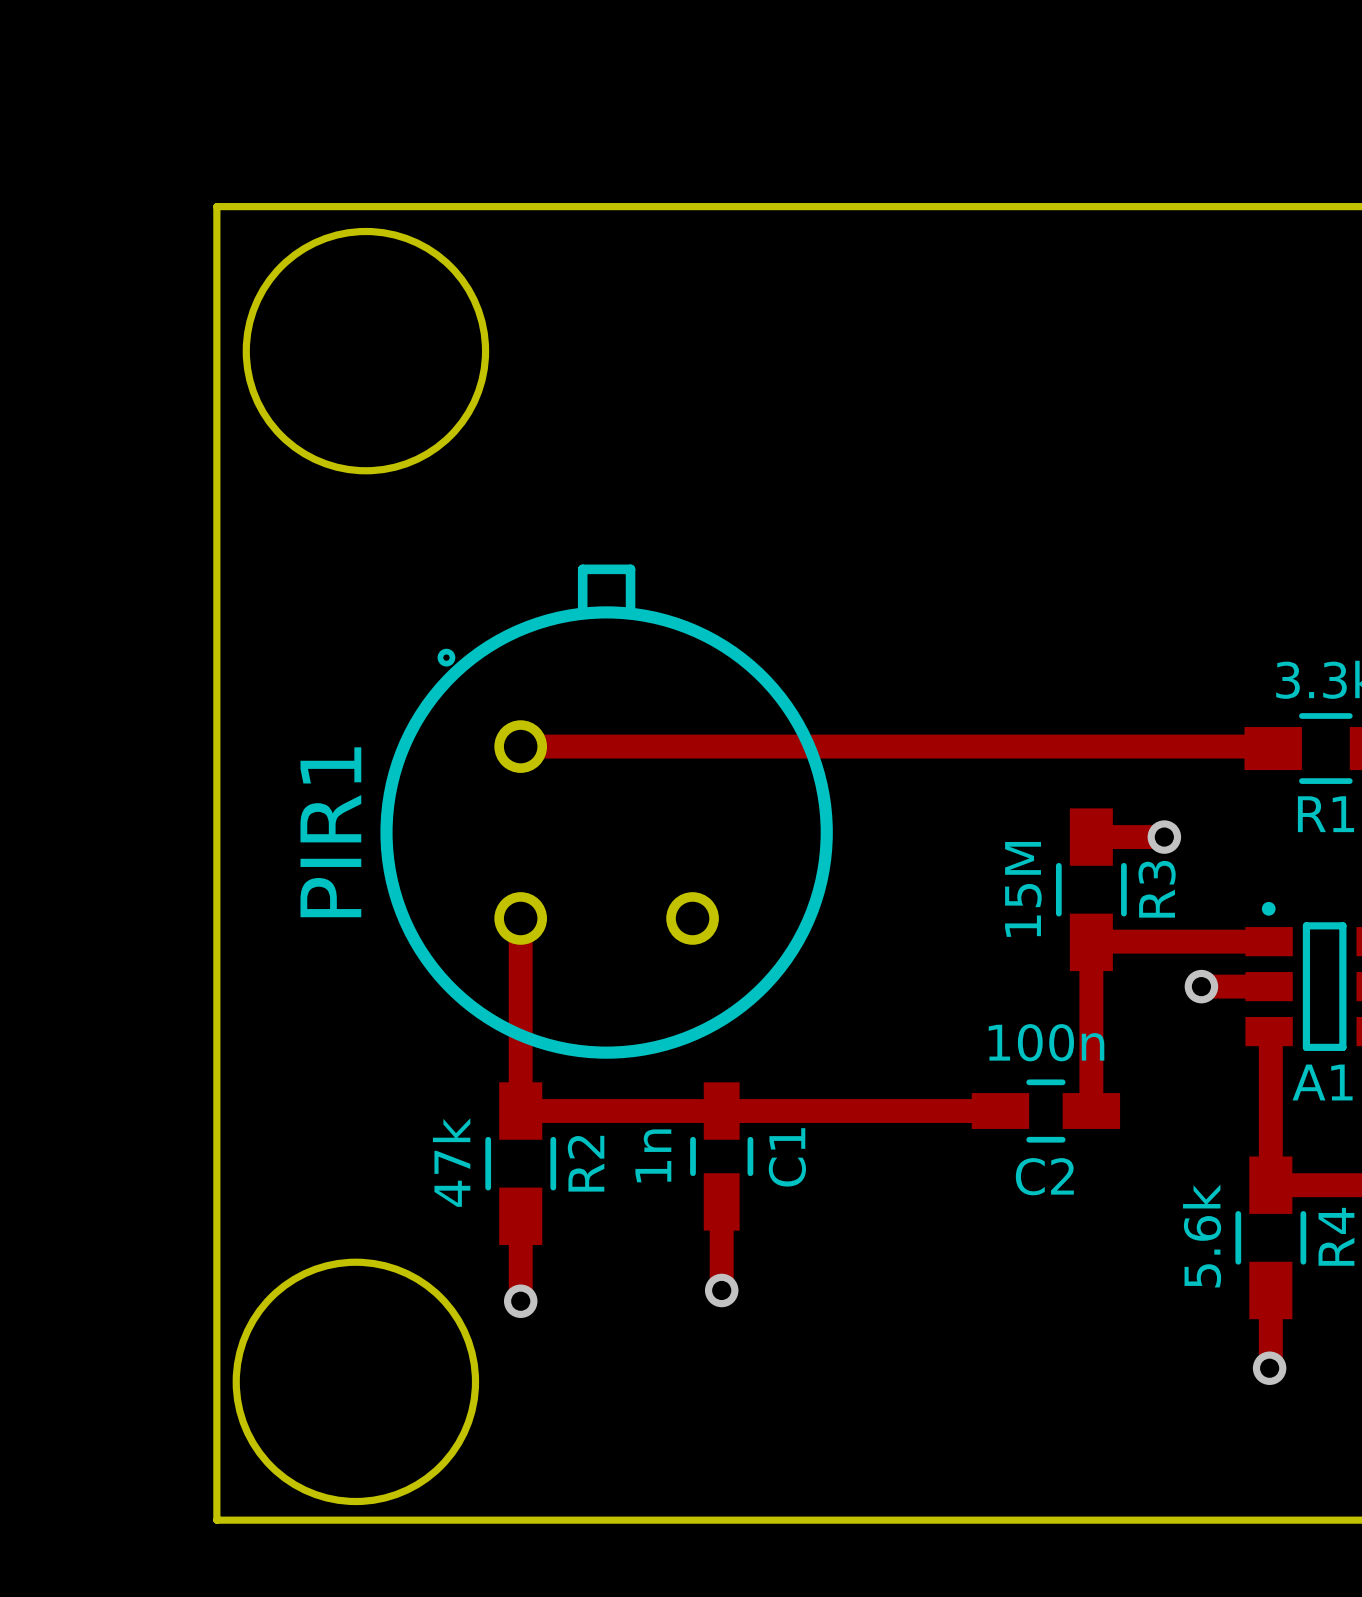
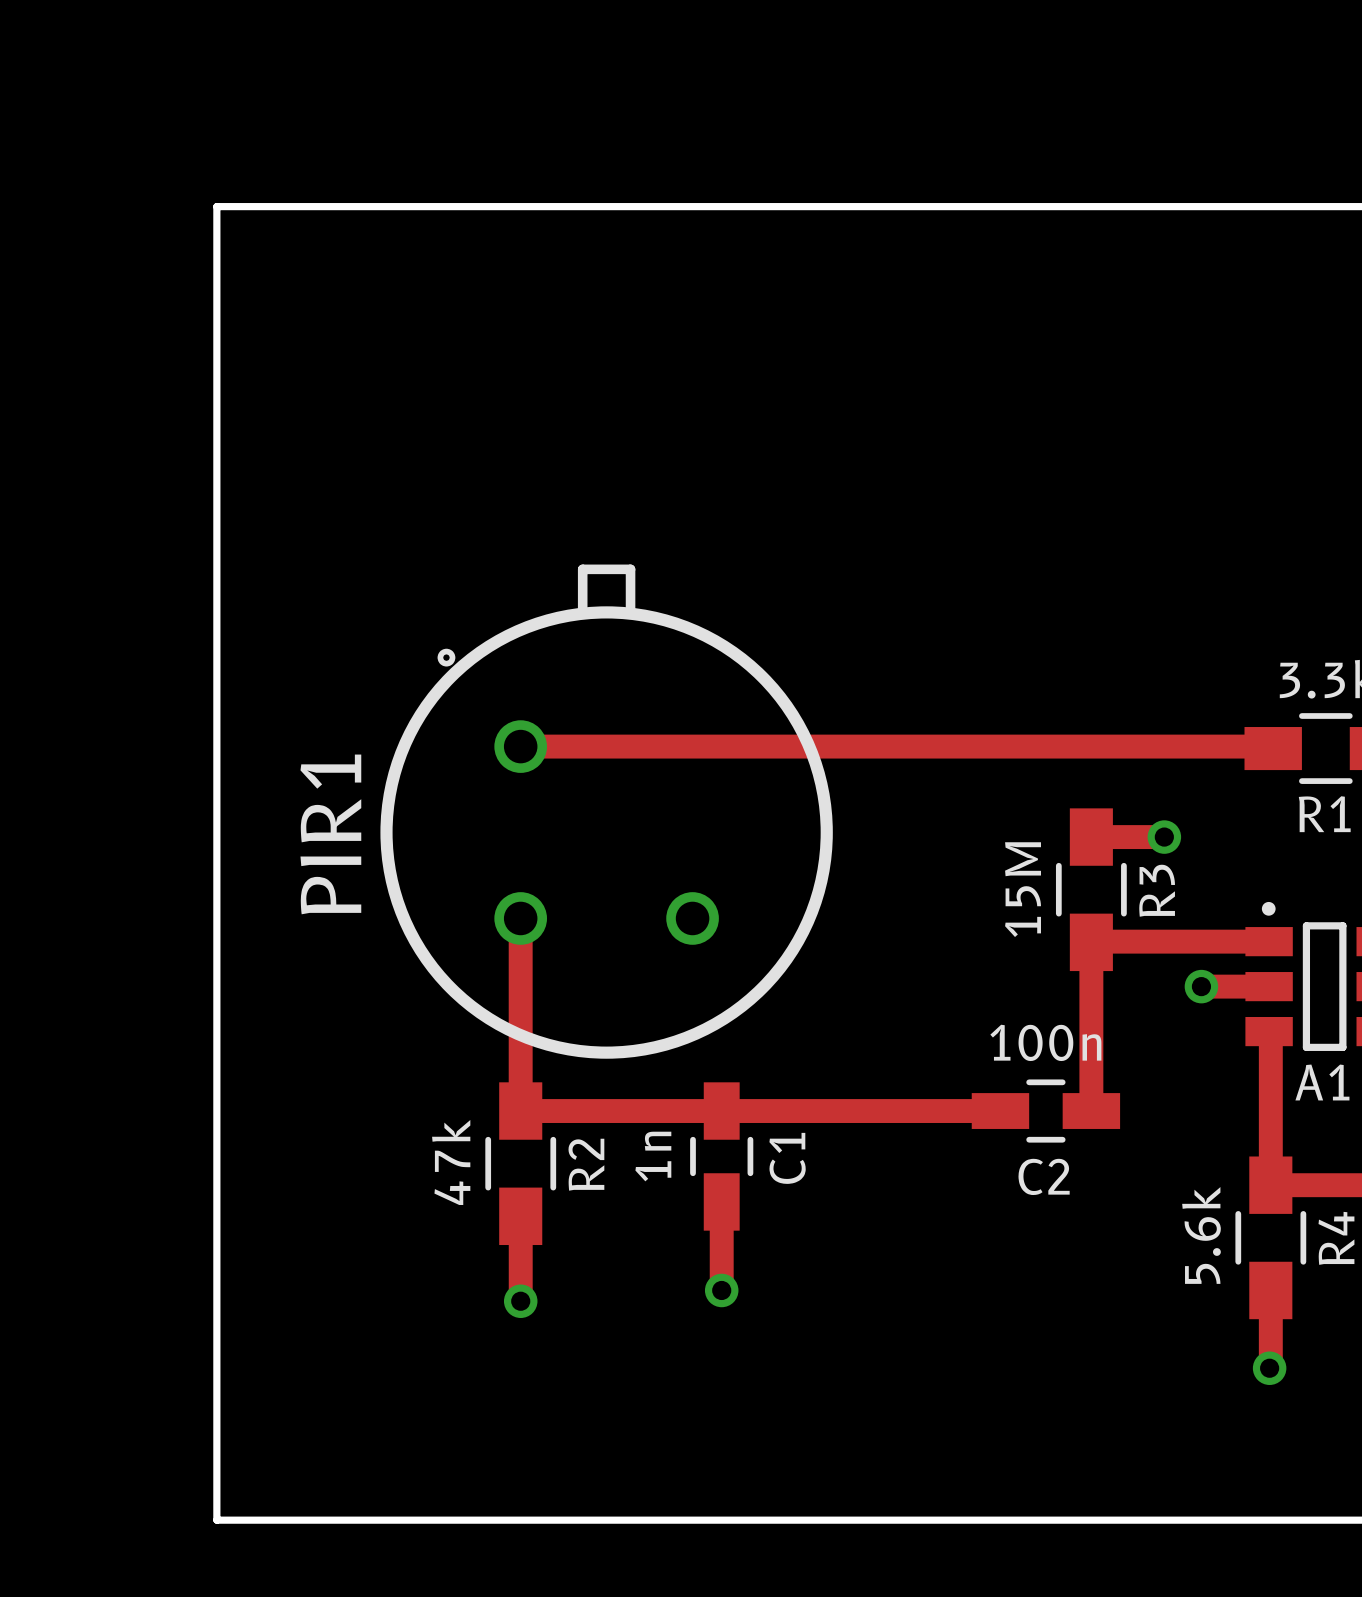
round board edge: [242, 227, 490, 475] -> none
round board edge: [232, 1258, 480, 1506] -> none

